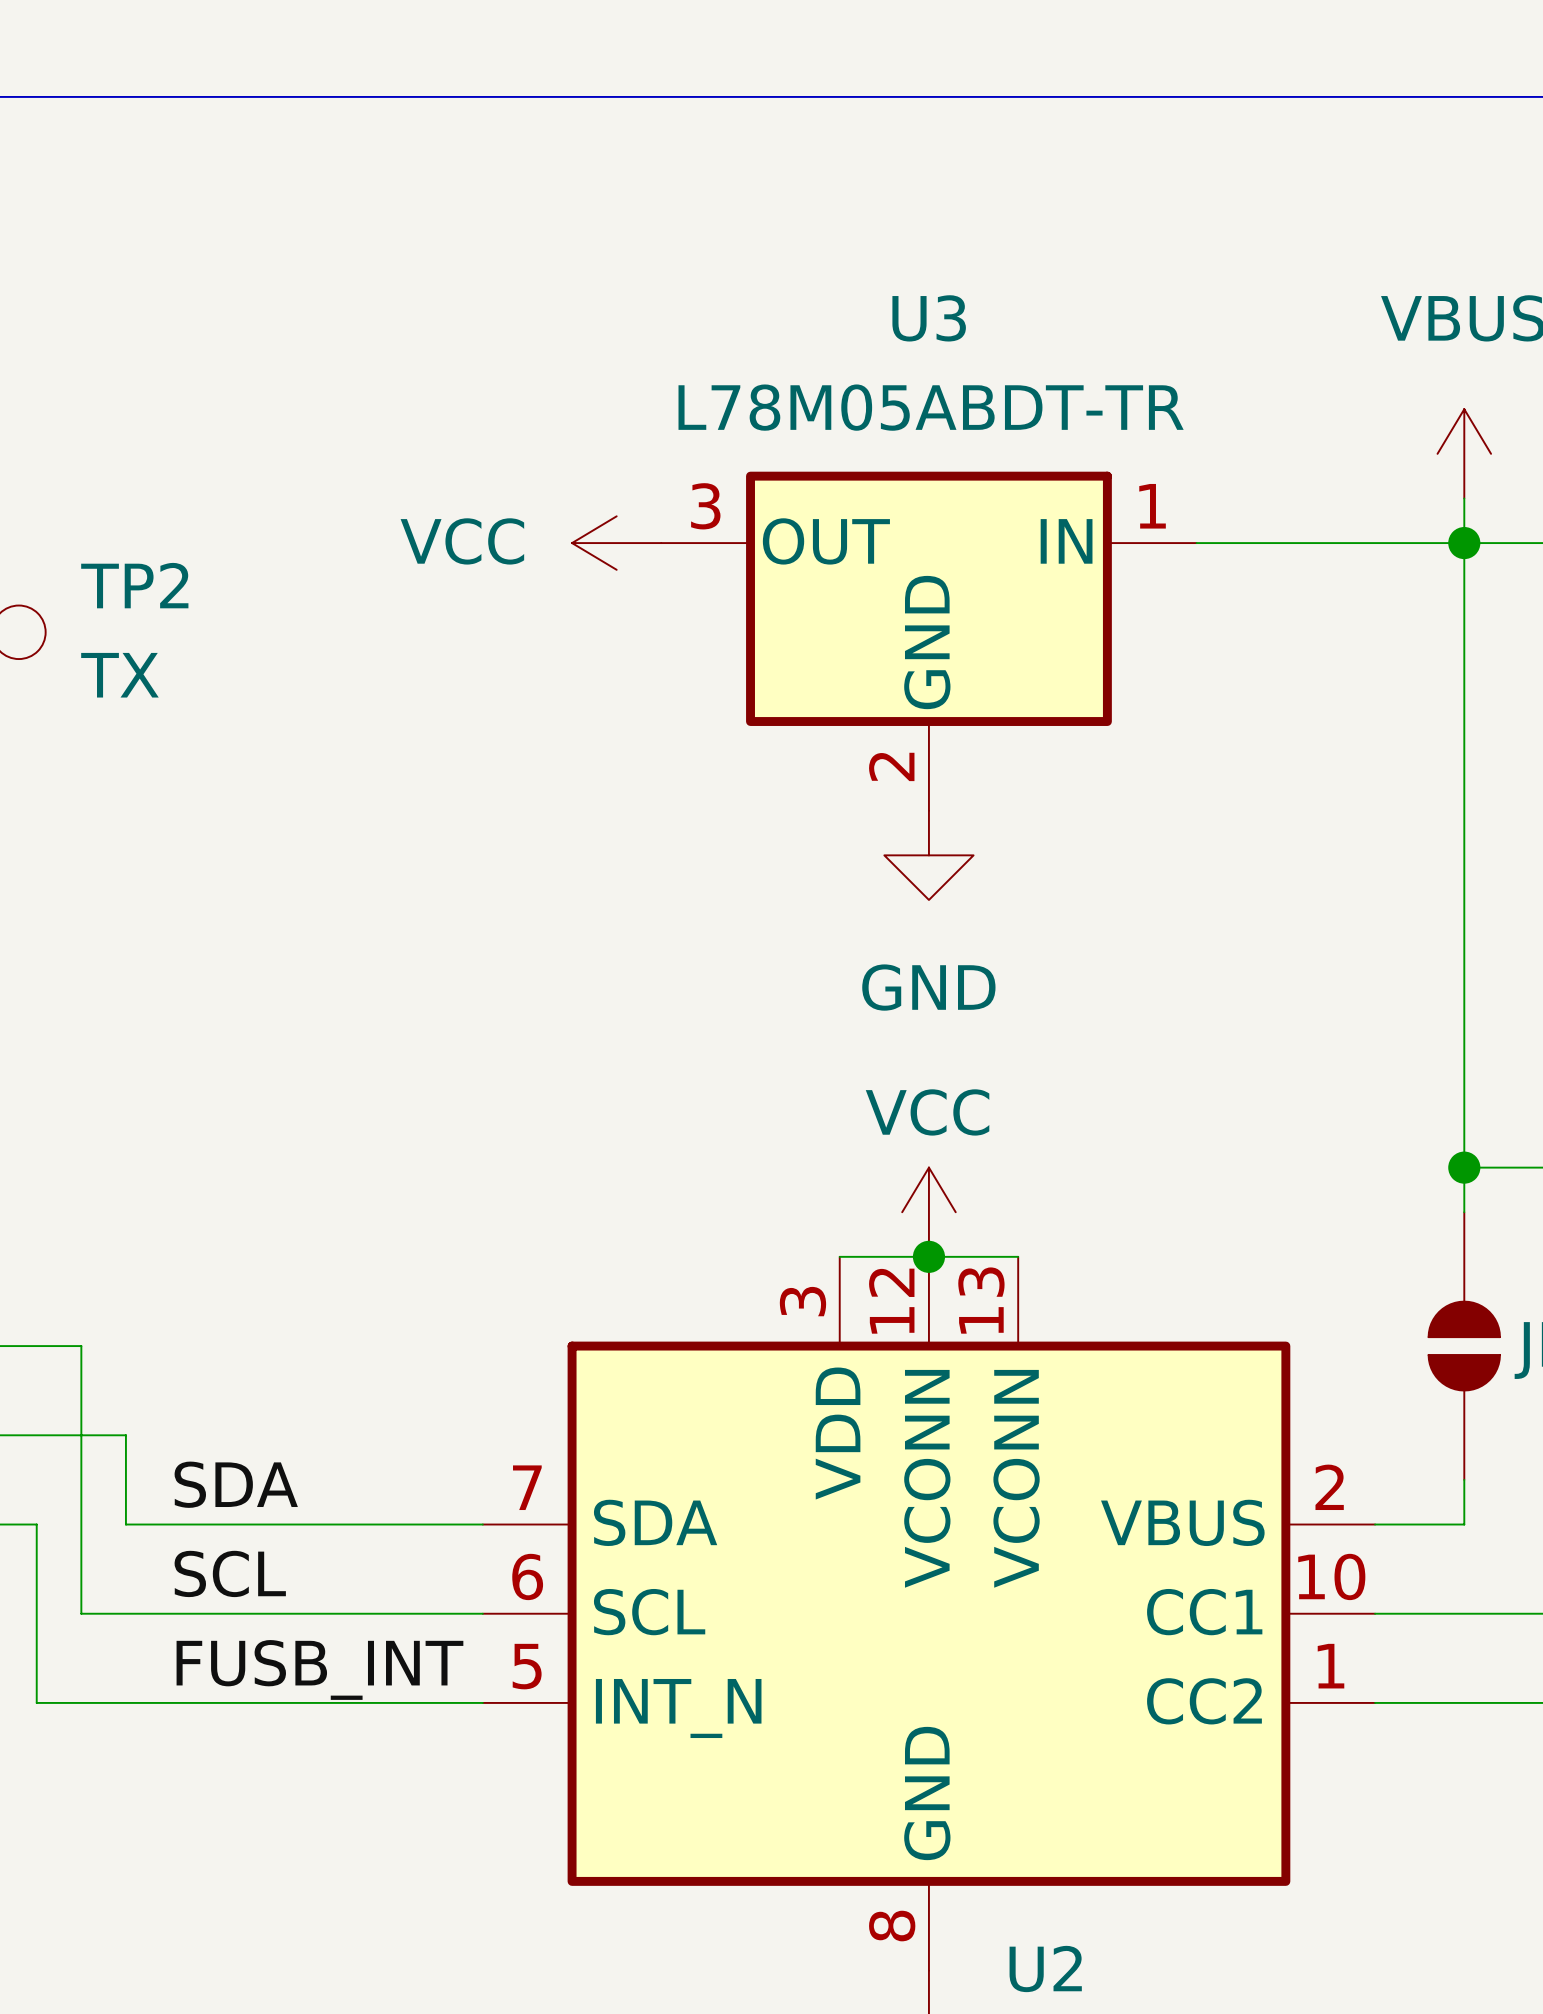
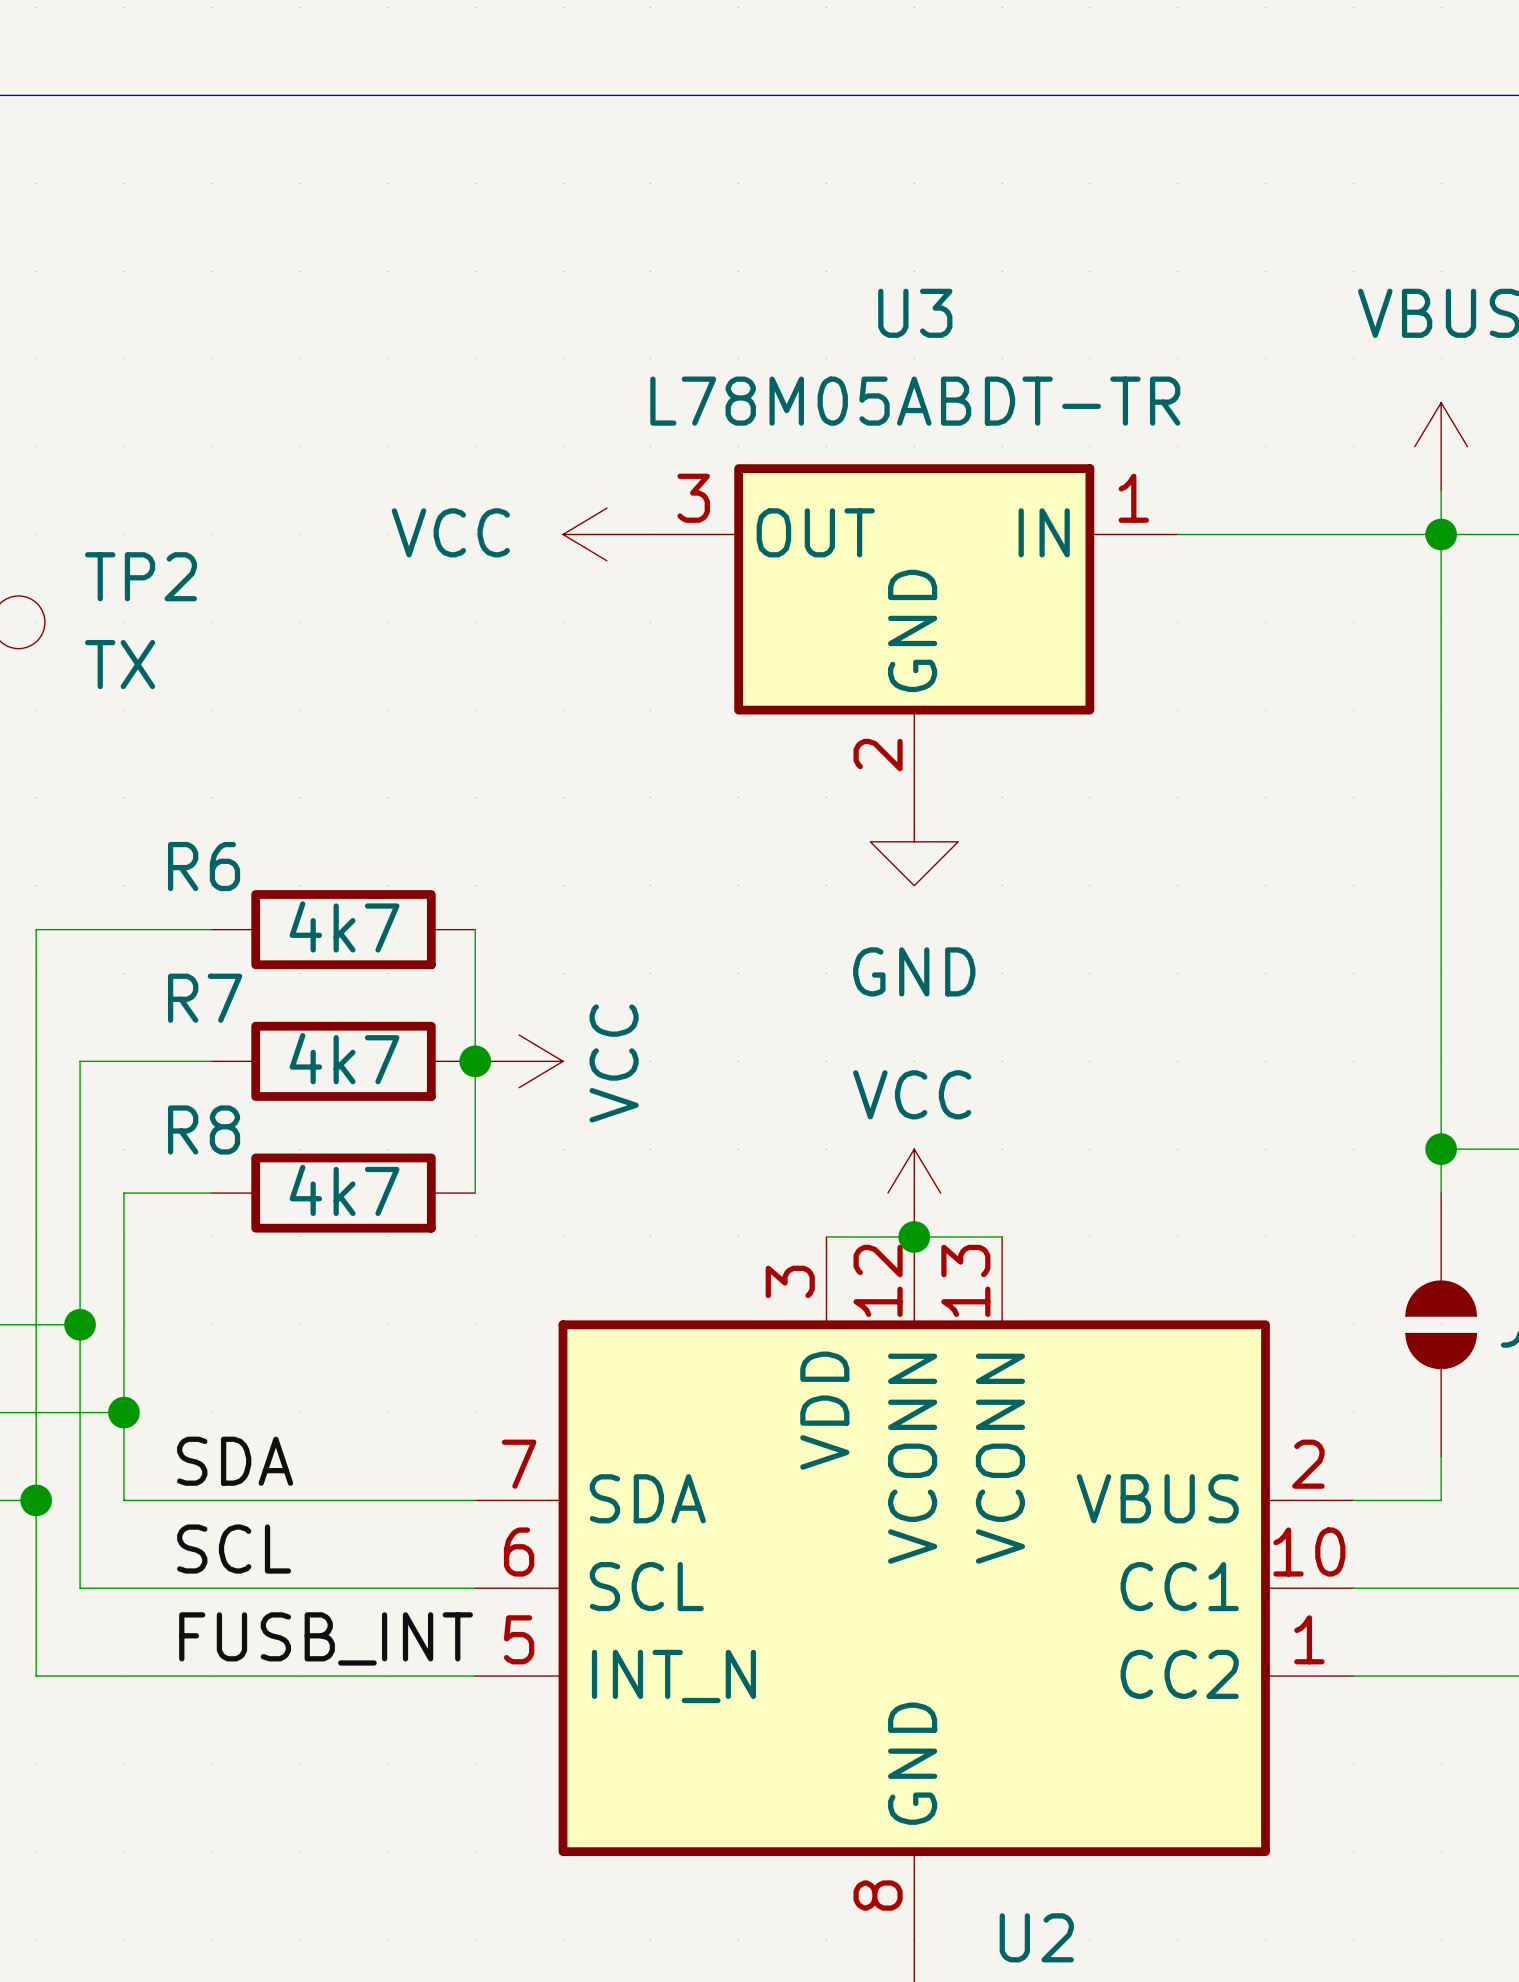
wire: none -> (211, 929) (36, 929) (36, 1500)
R6: none -> 4k7 (343, 929)
wire: none -> (475, 929) (475, 1193)
wire: none -> (211, 1061) (80, 1061) (80, 1324)
R7: none -> 4k7 (343, 1061)
junction: none -> (475, 1061)
power symbol: none -> VCC (519, 1061)
wire: none -> (211, 1193) (123, 1193) (123, 1412)
R8: none -> 4k7 (343, 1193)
junction: none -> (80, 1324)
junction: none -> (123, 1412)
junction: none -> (36, 1500)

